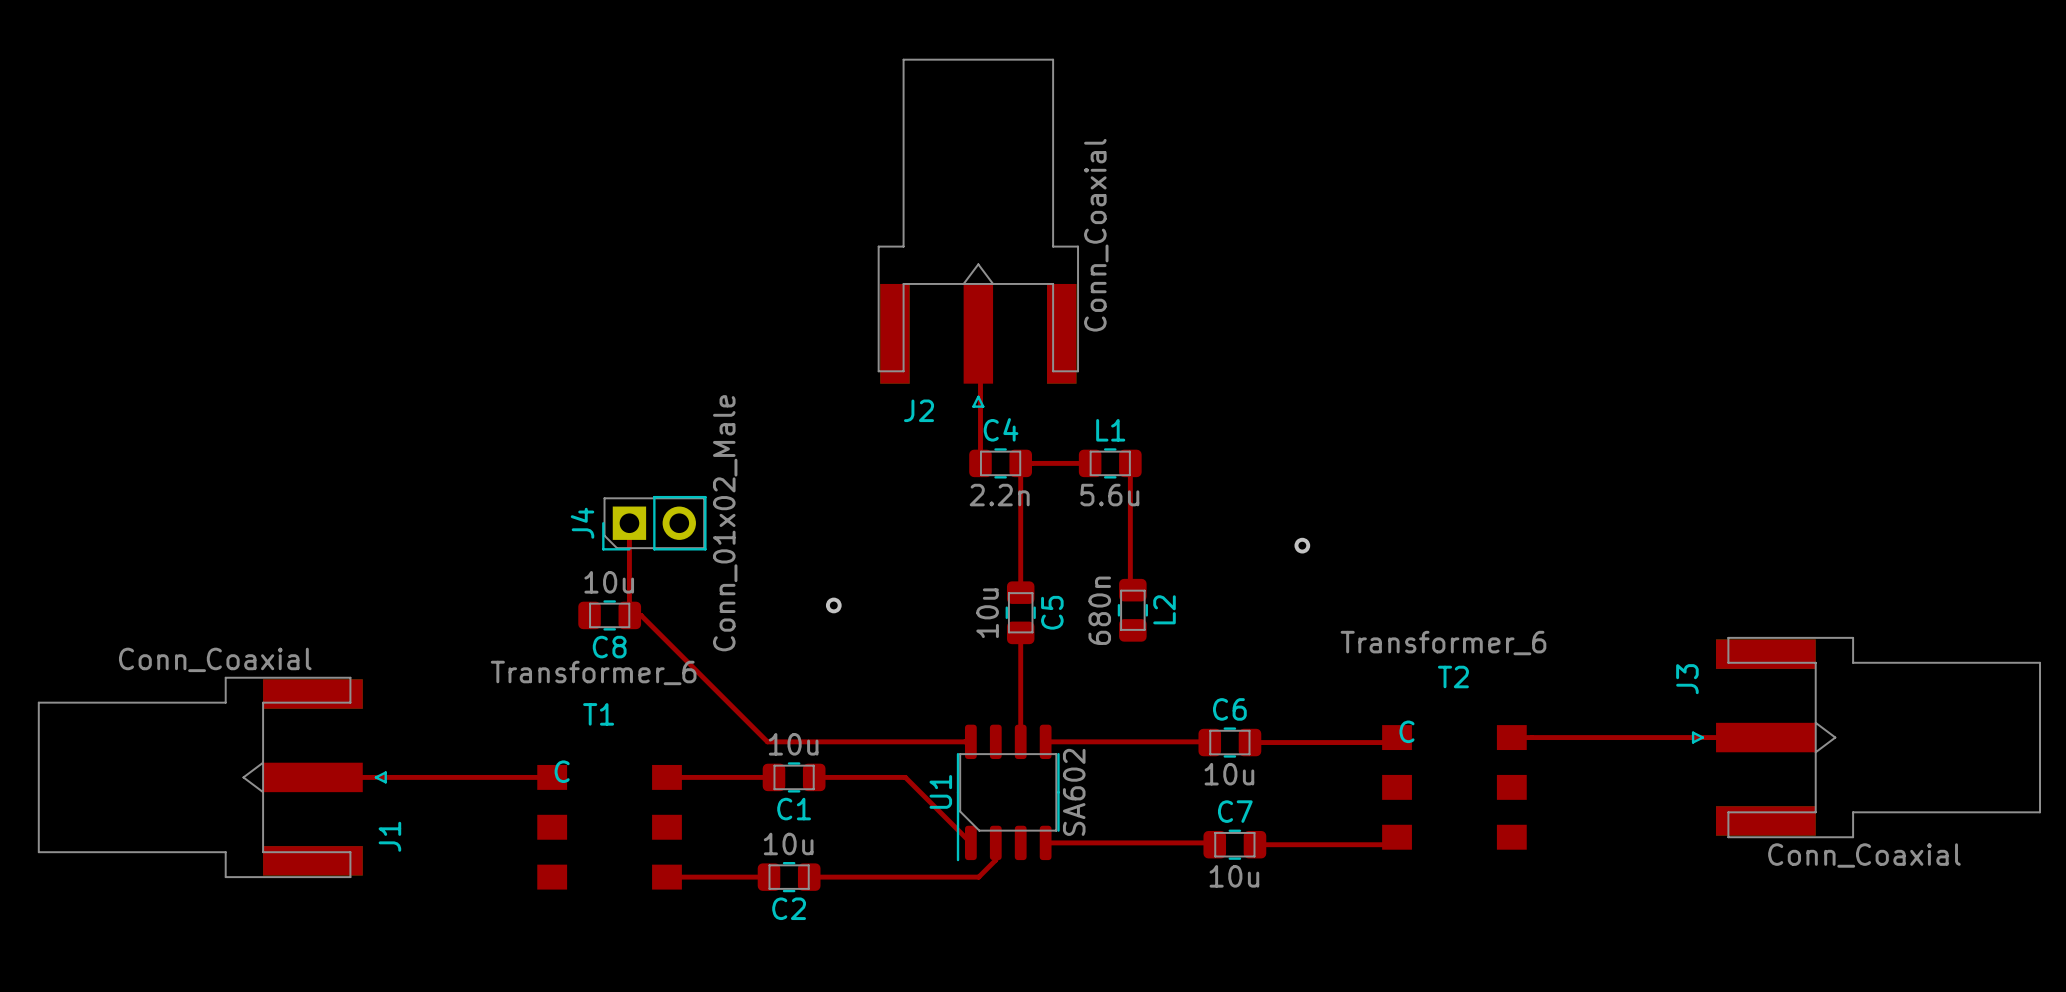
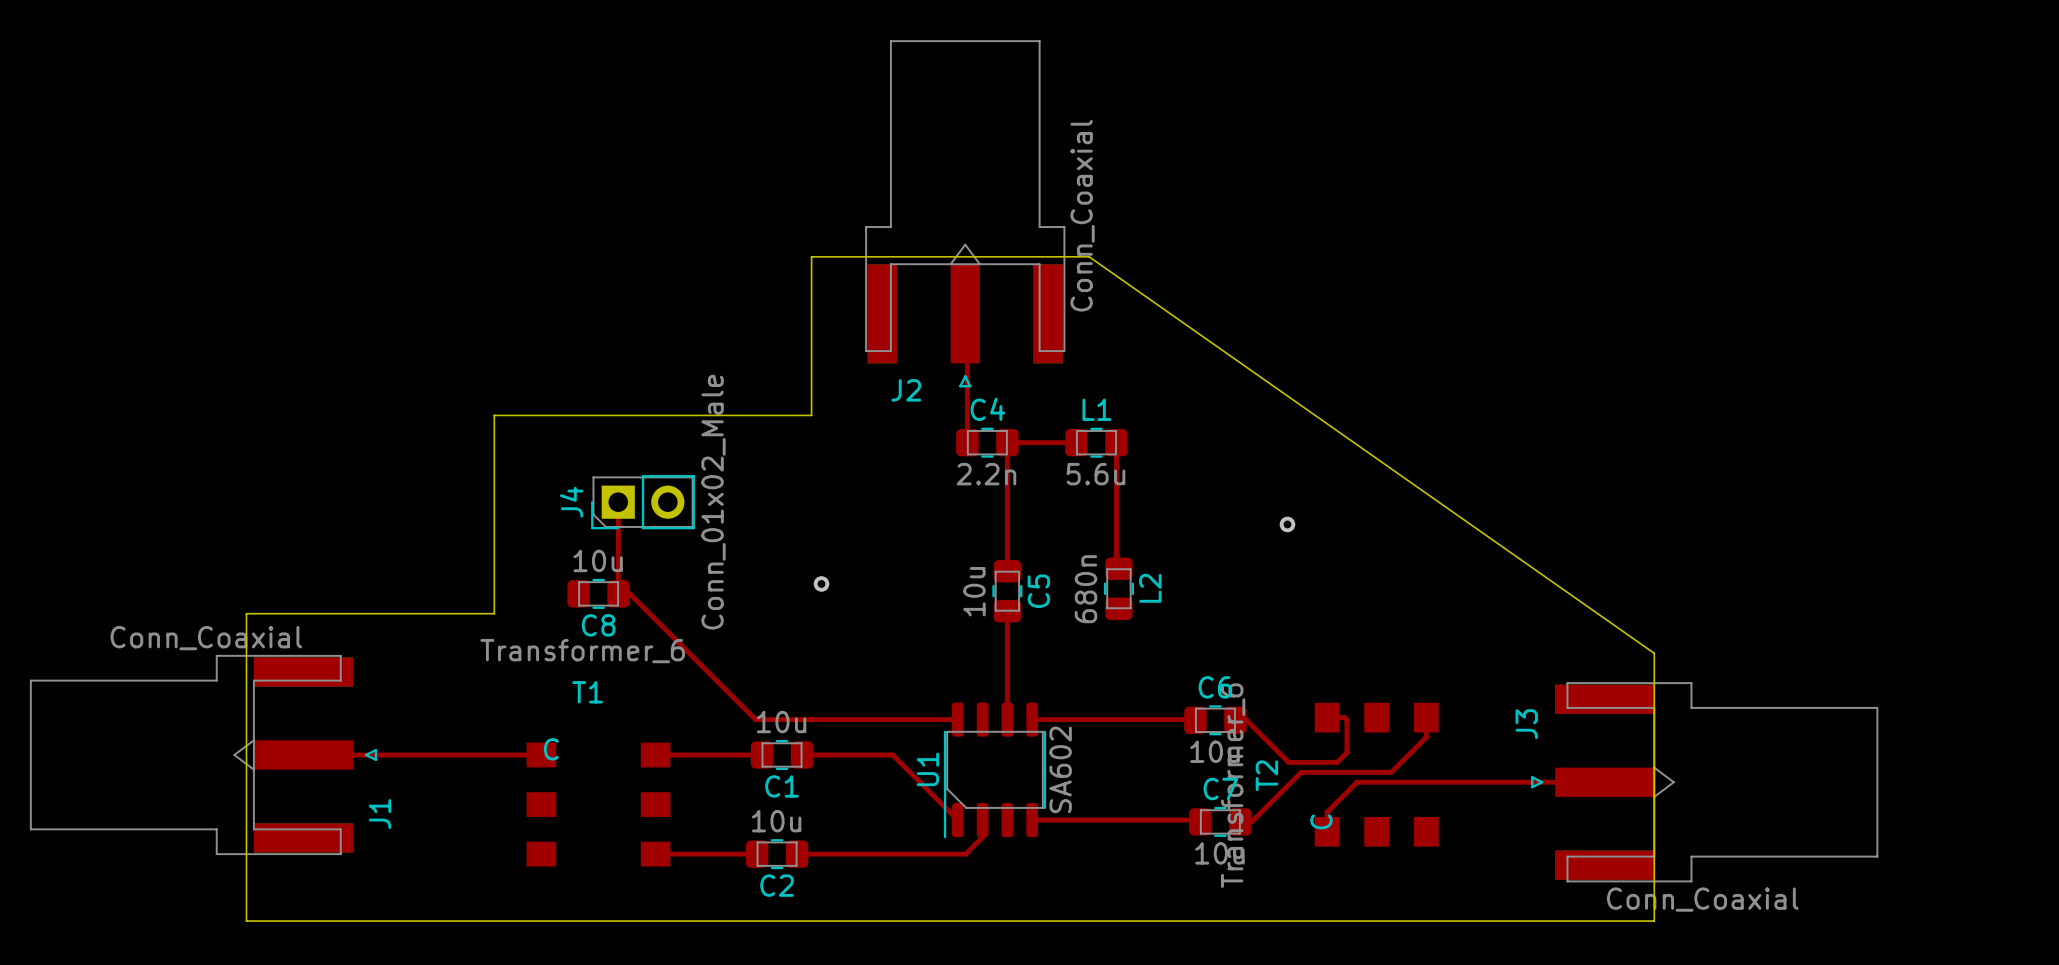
board edge: none -> (811, 256) (811, 415) (494, 415) (494, 613) (246, 613) (246, 921) (1654, 921) (1654, 653) (1089, 256) (811, 256)
top track: (1397, 737) (1392, 742) (1261, 742) -> (1327, 717) (1344, 717) (1346, 720) (1346, 752) (1337, 762) (1288, 762) (1246, 720)
top track: (1511, 737) (1765, 737) -> none
J3 position: (1866, 737) -> (1704, 782)
T2 rotation: 0° (1454, 787) -> 90° counterclockwise (1376, 774)
top track: none -> (1357, 782) (1327, 812) (1327, 831)
top track: none -> (1357, 782) (1604, 782)
top track: (1397, 837) (1389, 844) (1266, 844) -> (1426, 717) (1426, 737) (1391, 772) (1301, 772) (1251, 821)

